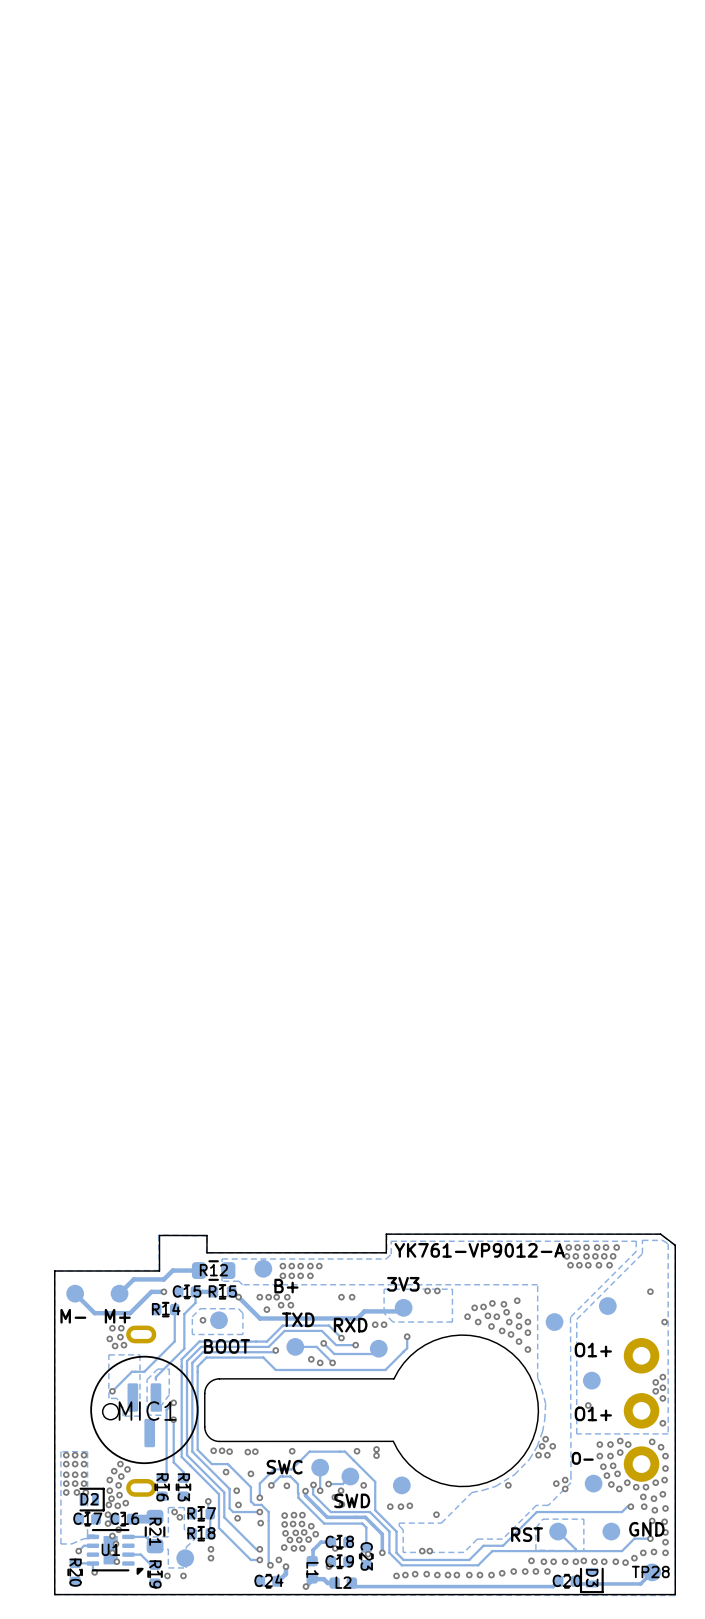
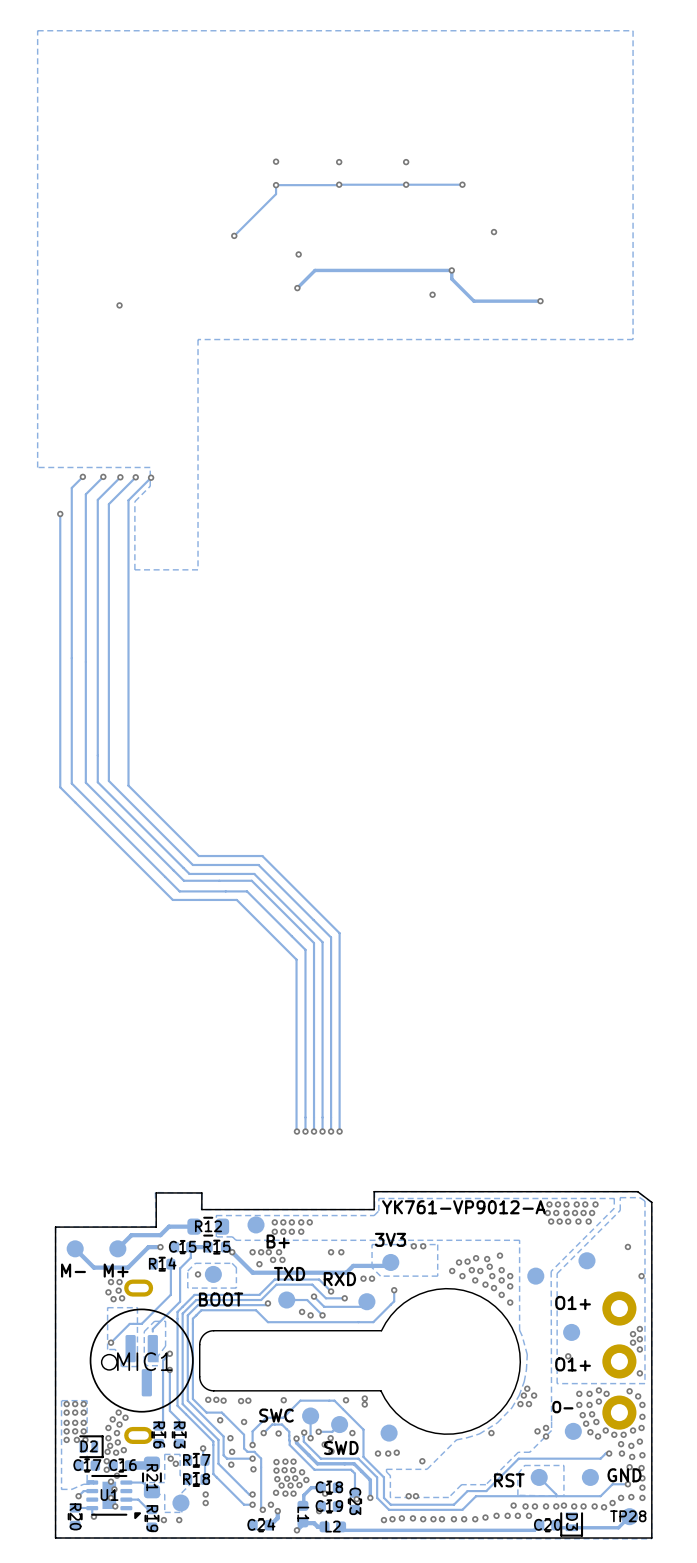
zone outline: none -> (633, 30) (37, 30) (37, 467) (150, 467) (150, 486) (134, 501) (134, 569) (198, 569) (198, 339) (633, 339) (633, 30)
via: none -> (276, 161)
via: none -> (339, 162)
via: none -> (406, 162)
via: none -> (276, 185)
via: none -> (339, 184)
via: none -> (406, 184)
track: none -> (462, 184) (276, 185) (276, 194) (234, 235)
via: none -> (462, 184)
via: none -> (494, 232)
via: none -> (234, 235)
via: none -> (298, 254)
via: none -> (451, 270)
track: none -> (297, 288) (315, 270) (451, 270) (451, 278) (473, 301) (540, 301)
via: none -> (297, 288)
via: none -> (432, 294)
via: none -> (540, 301)
via: none -> (119, 305)
track: none -> (82, 476) (71, 487) (71, 783) (179, 891) (247, 891) (305, 949) (305, 1131)
via: none -> (82, 476)
track: none -> (103, 476) (85, 494) (85, 782) (183, 880) (251, 880) (314, 943) (314, 1131)
via: none -> (103, 476)
track: none -> (120, 477) (97, 499) (97, 782) (189, 873) (254, 873) (322, 942) (322, 1131)
via: none -> (120, 477)
track: none -> (135, 477) (108, 504) (108, 780) (192, 864) (258, 864) (331, 937) (331, 1131)
via: none -> (135, 477)
track: none -> (151, 477) (128, 500) (128, 785) (198, 856) (262, 856) (339, 933) (339, 1131)
via: none -> (151, 477)
track: none -> (60, 513) (60, 787) (172, 899) (236, 899) (296, 959) (296, 1131)
via: none -> (60, 513)
via: none -> (296, 1131)
via: none -> (305, 1131)
via: none -> (314, 1131)
via: none -> (322, 1131)
via: none -> (331, 1131)
via: none -> (339, 1131)

